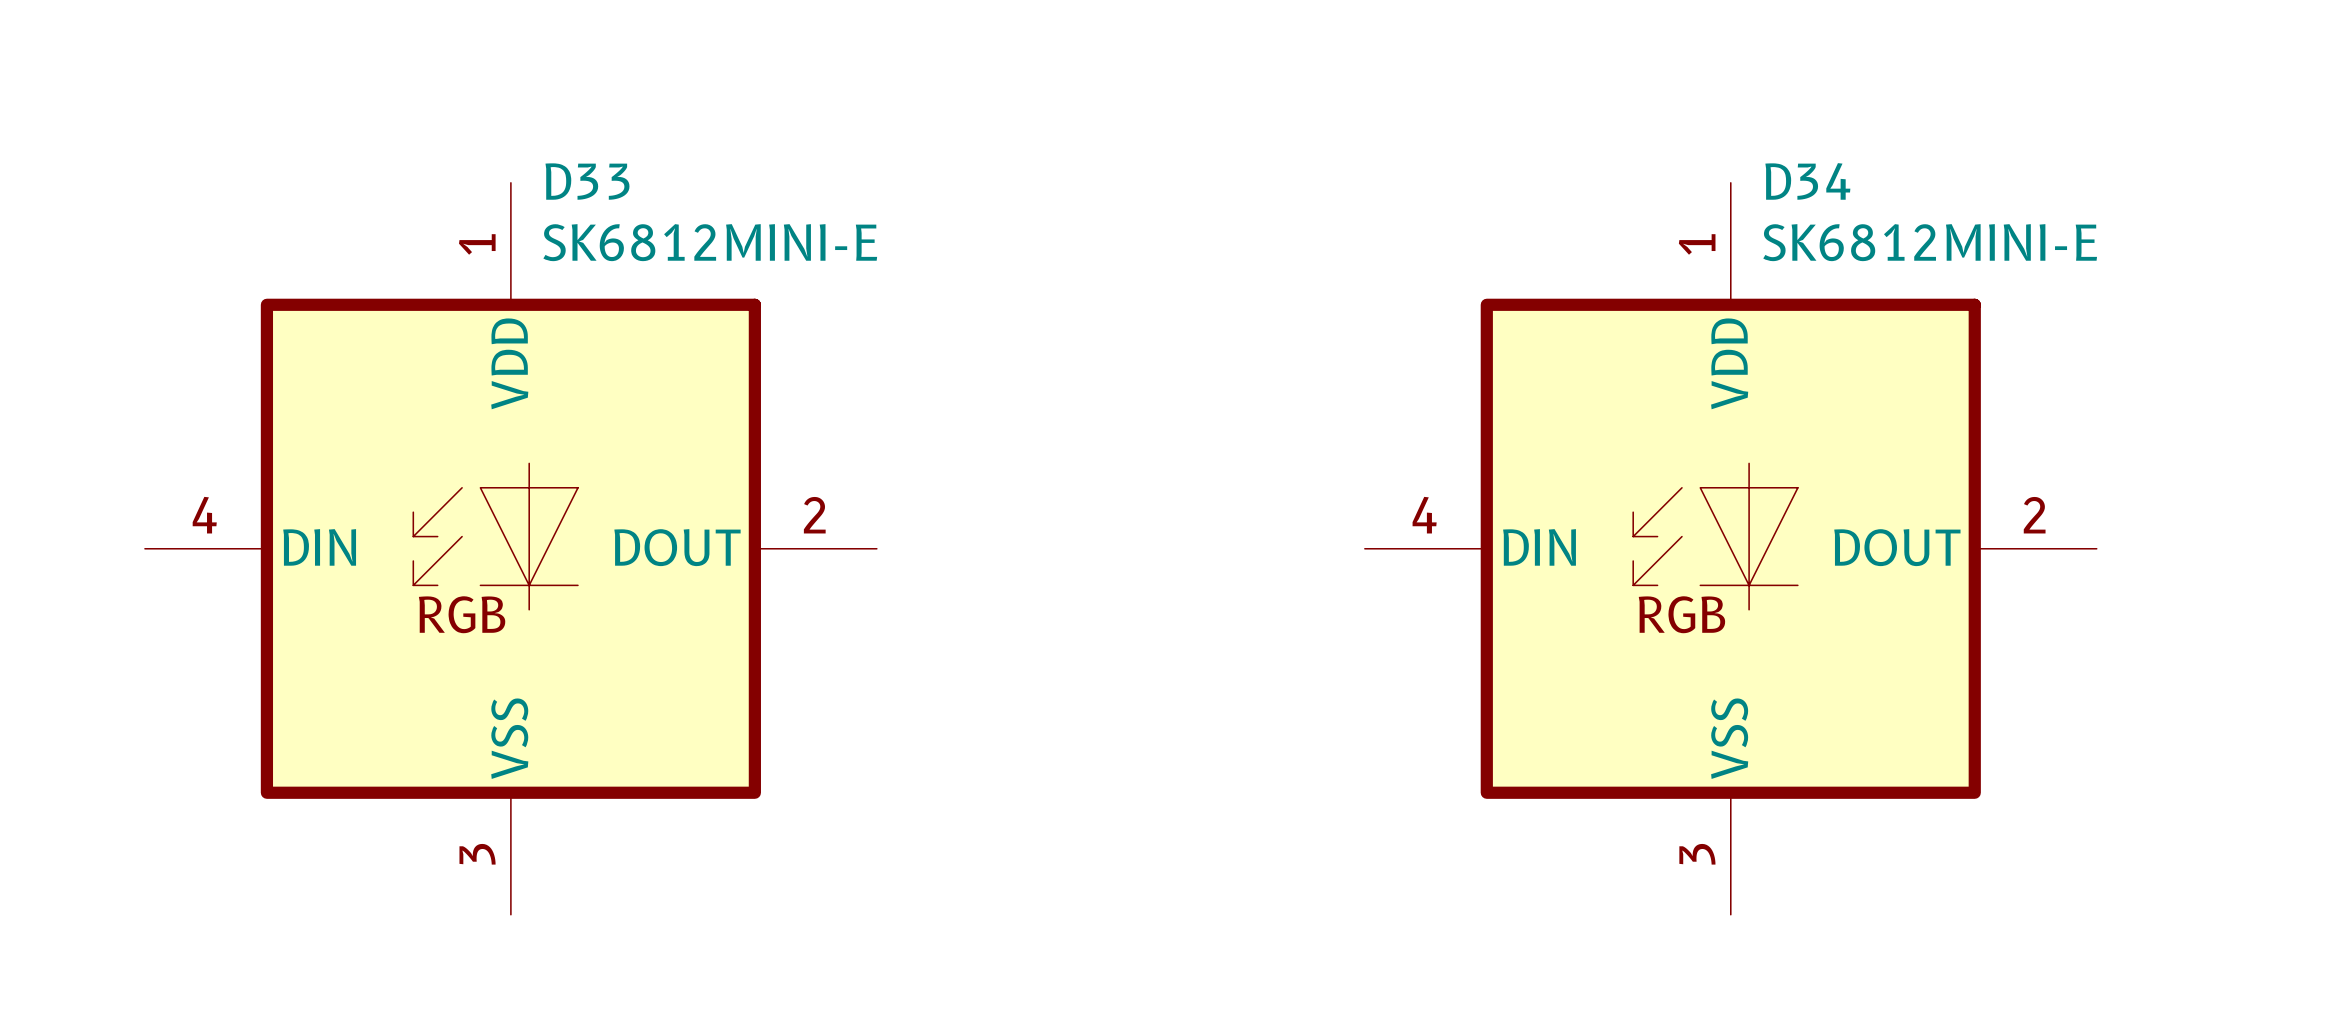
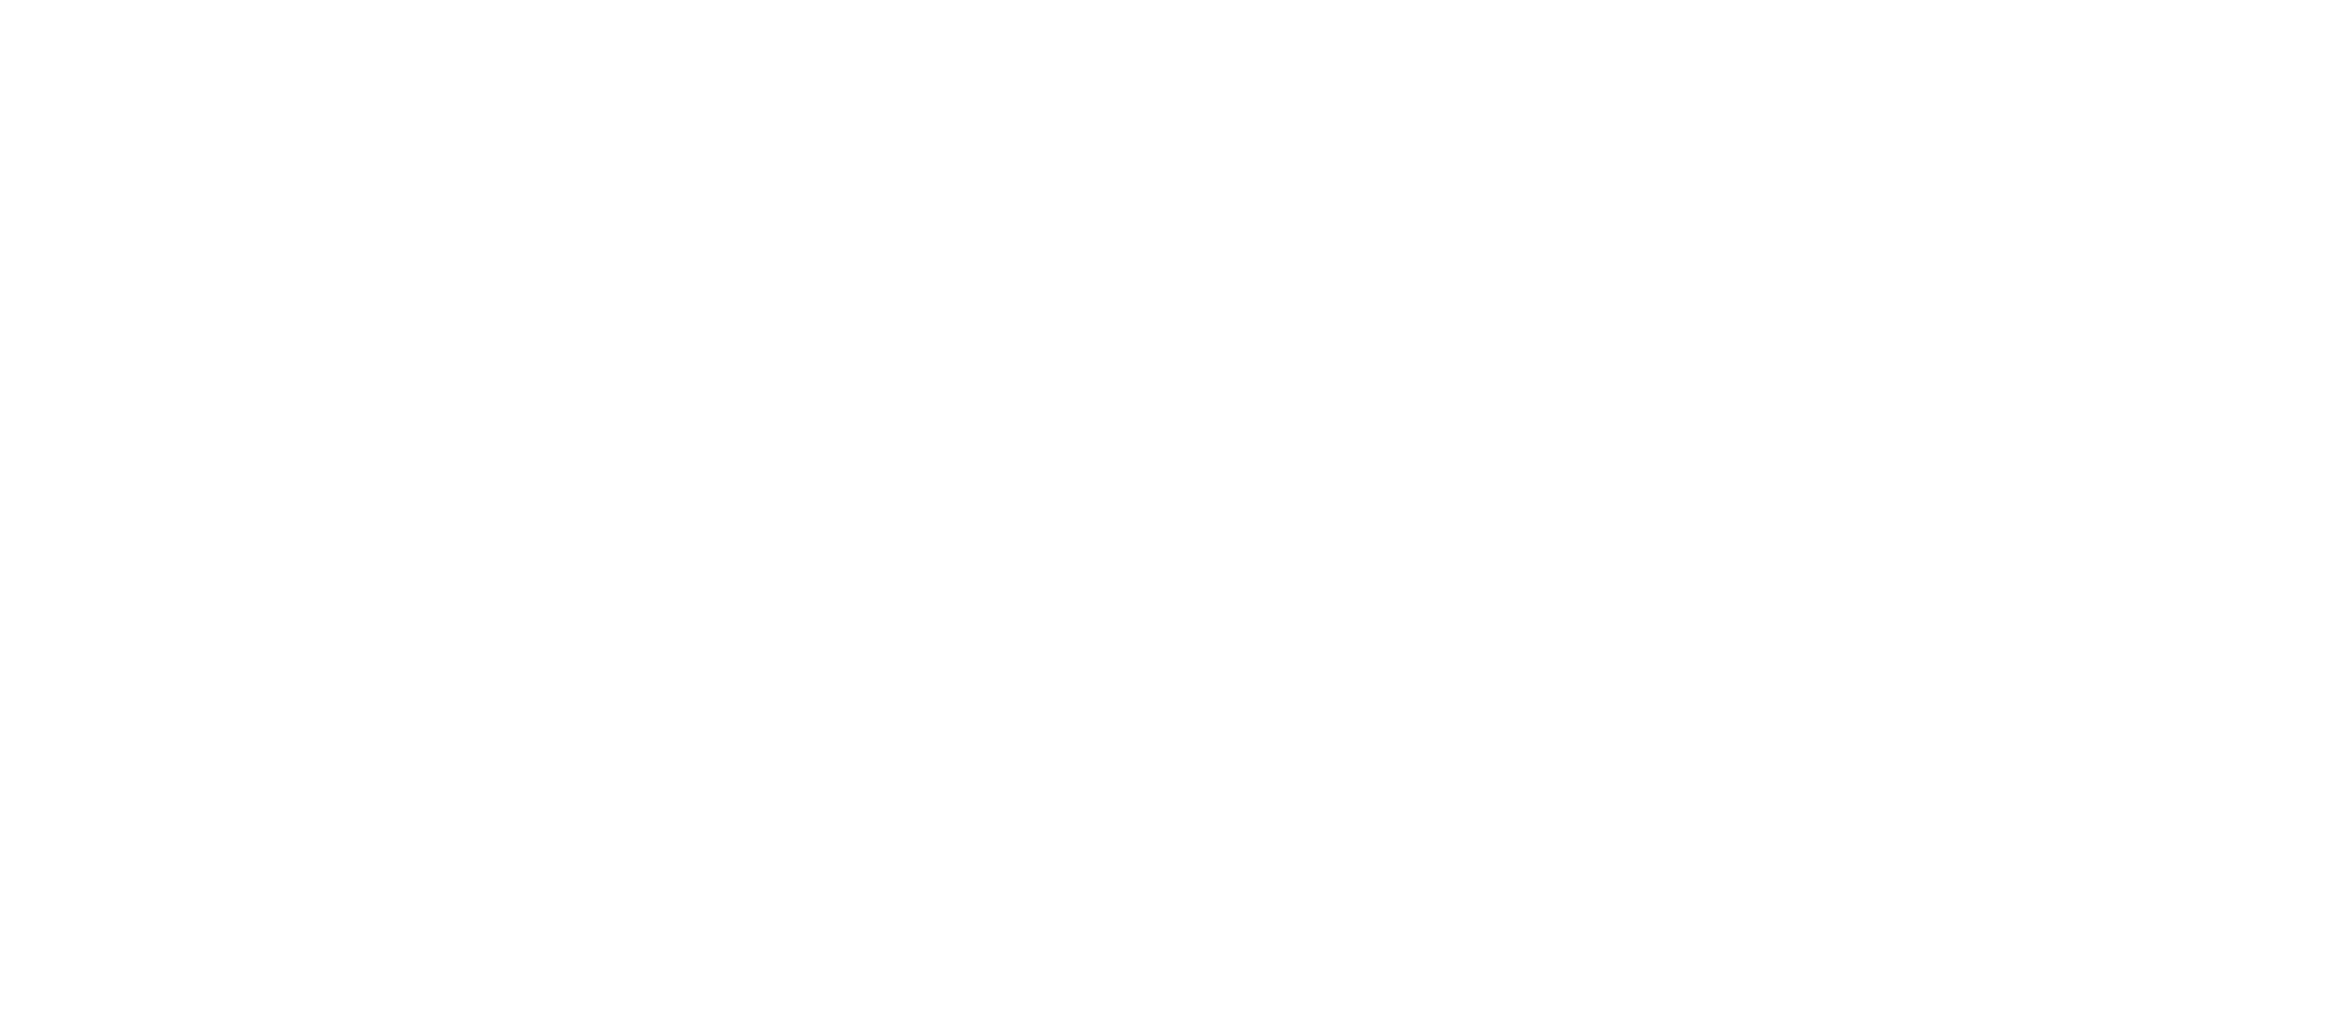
D33: SK6812MINI-E (510, 548) -> none
D34: SK6812MINI-E (1730, 548) -> none

